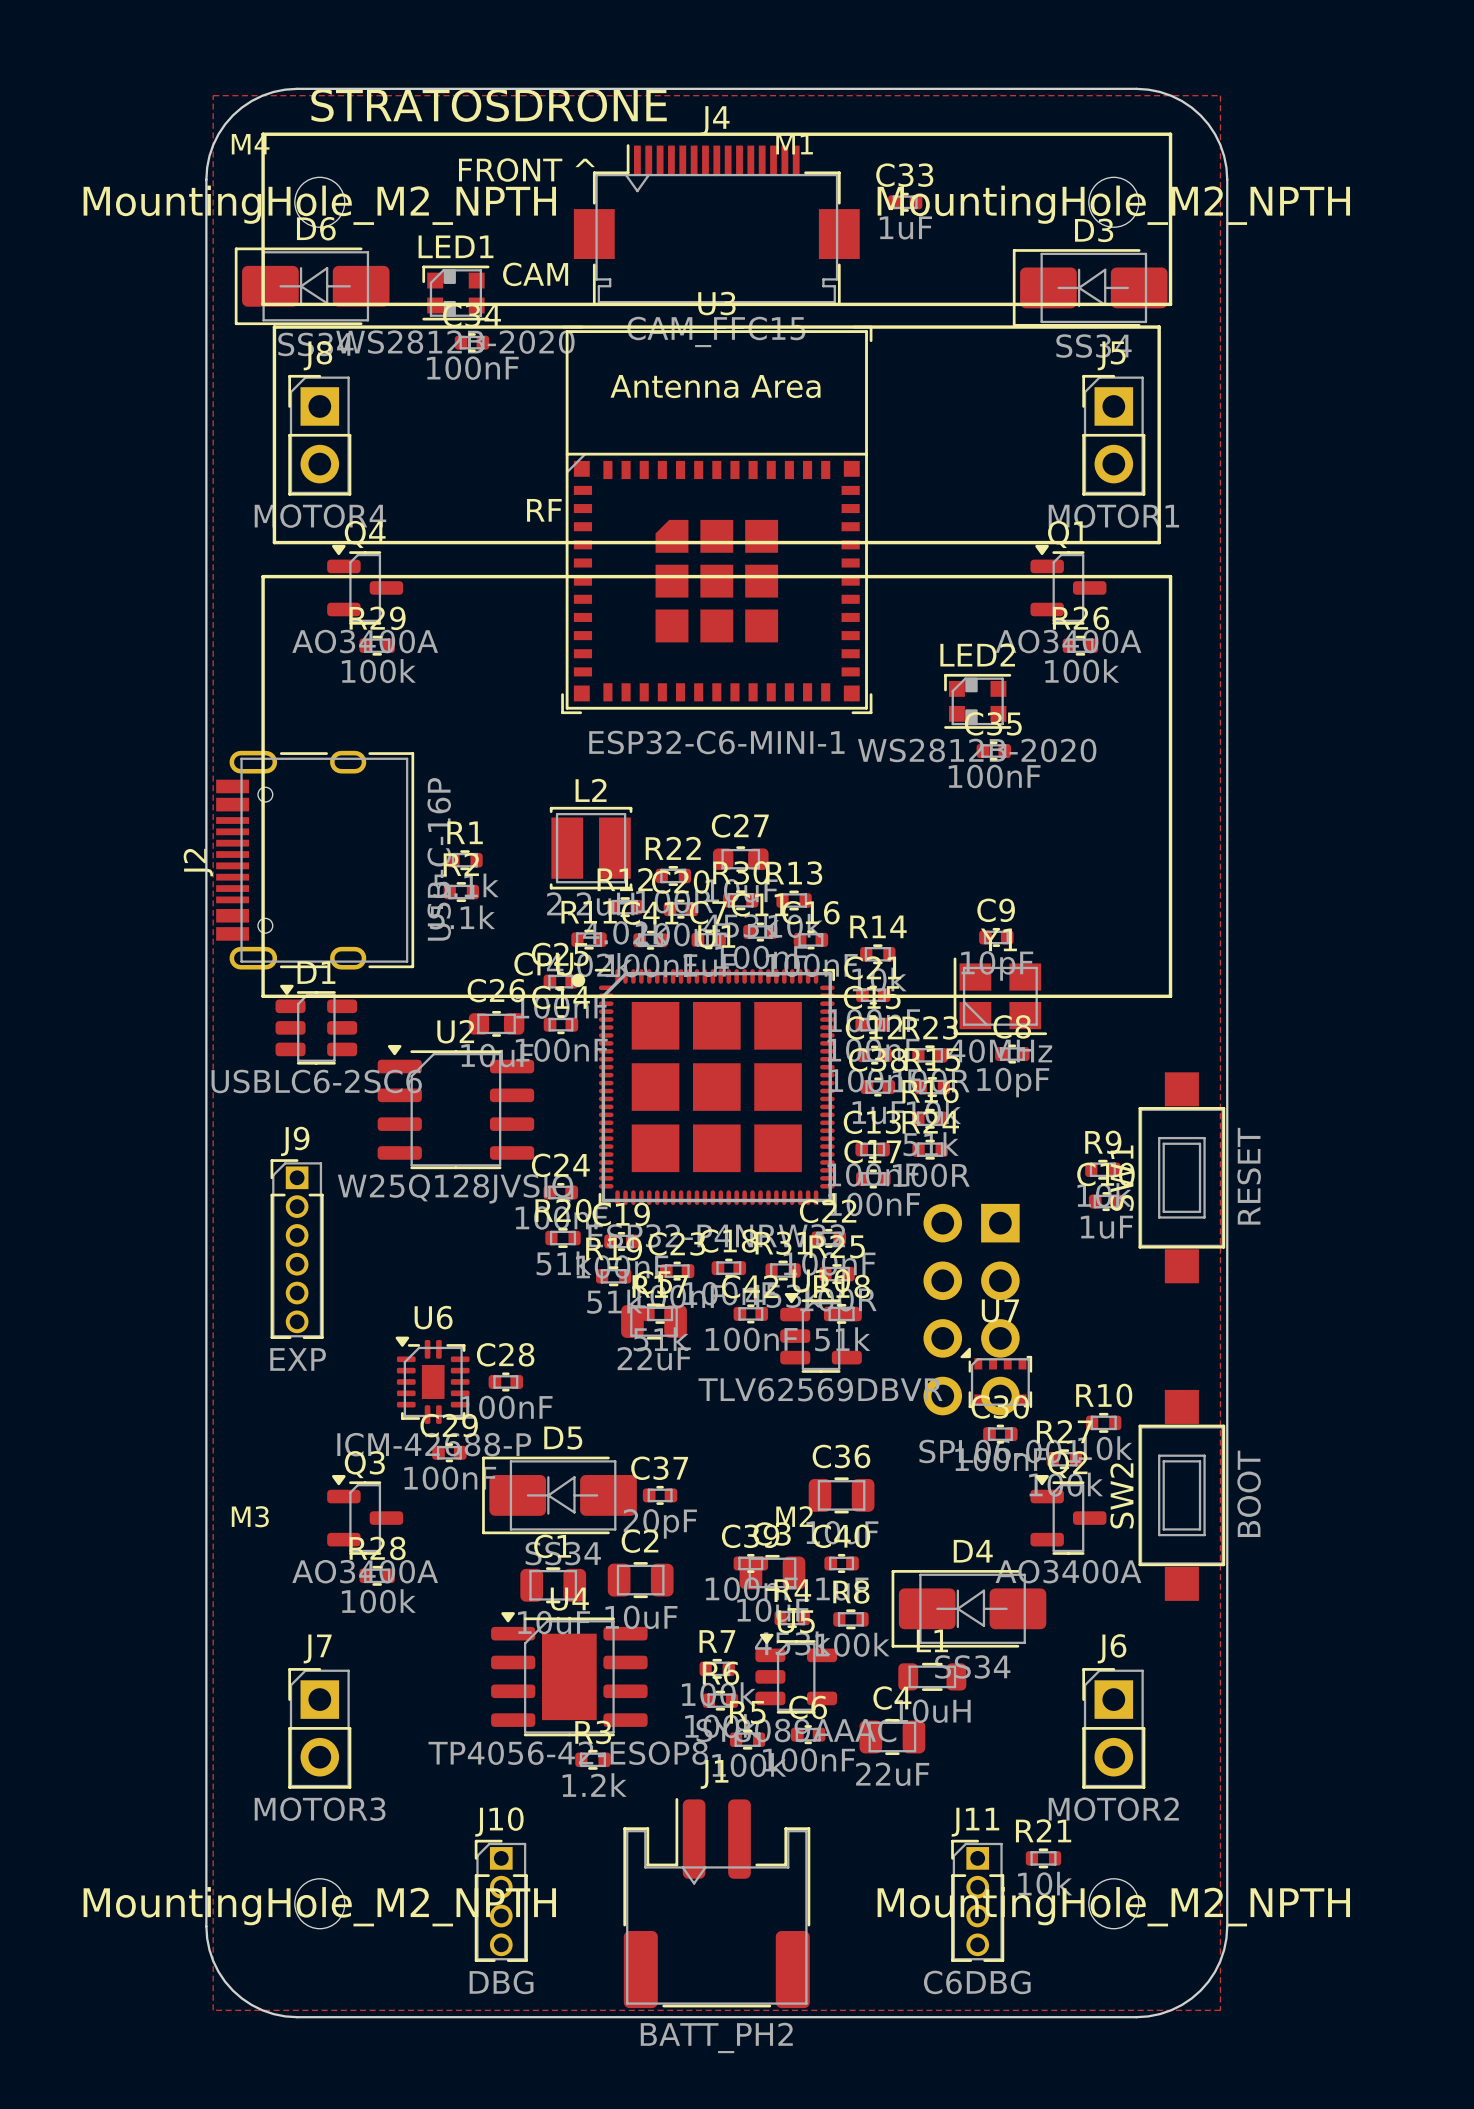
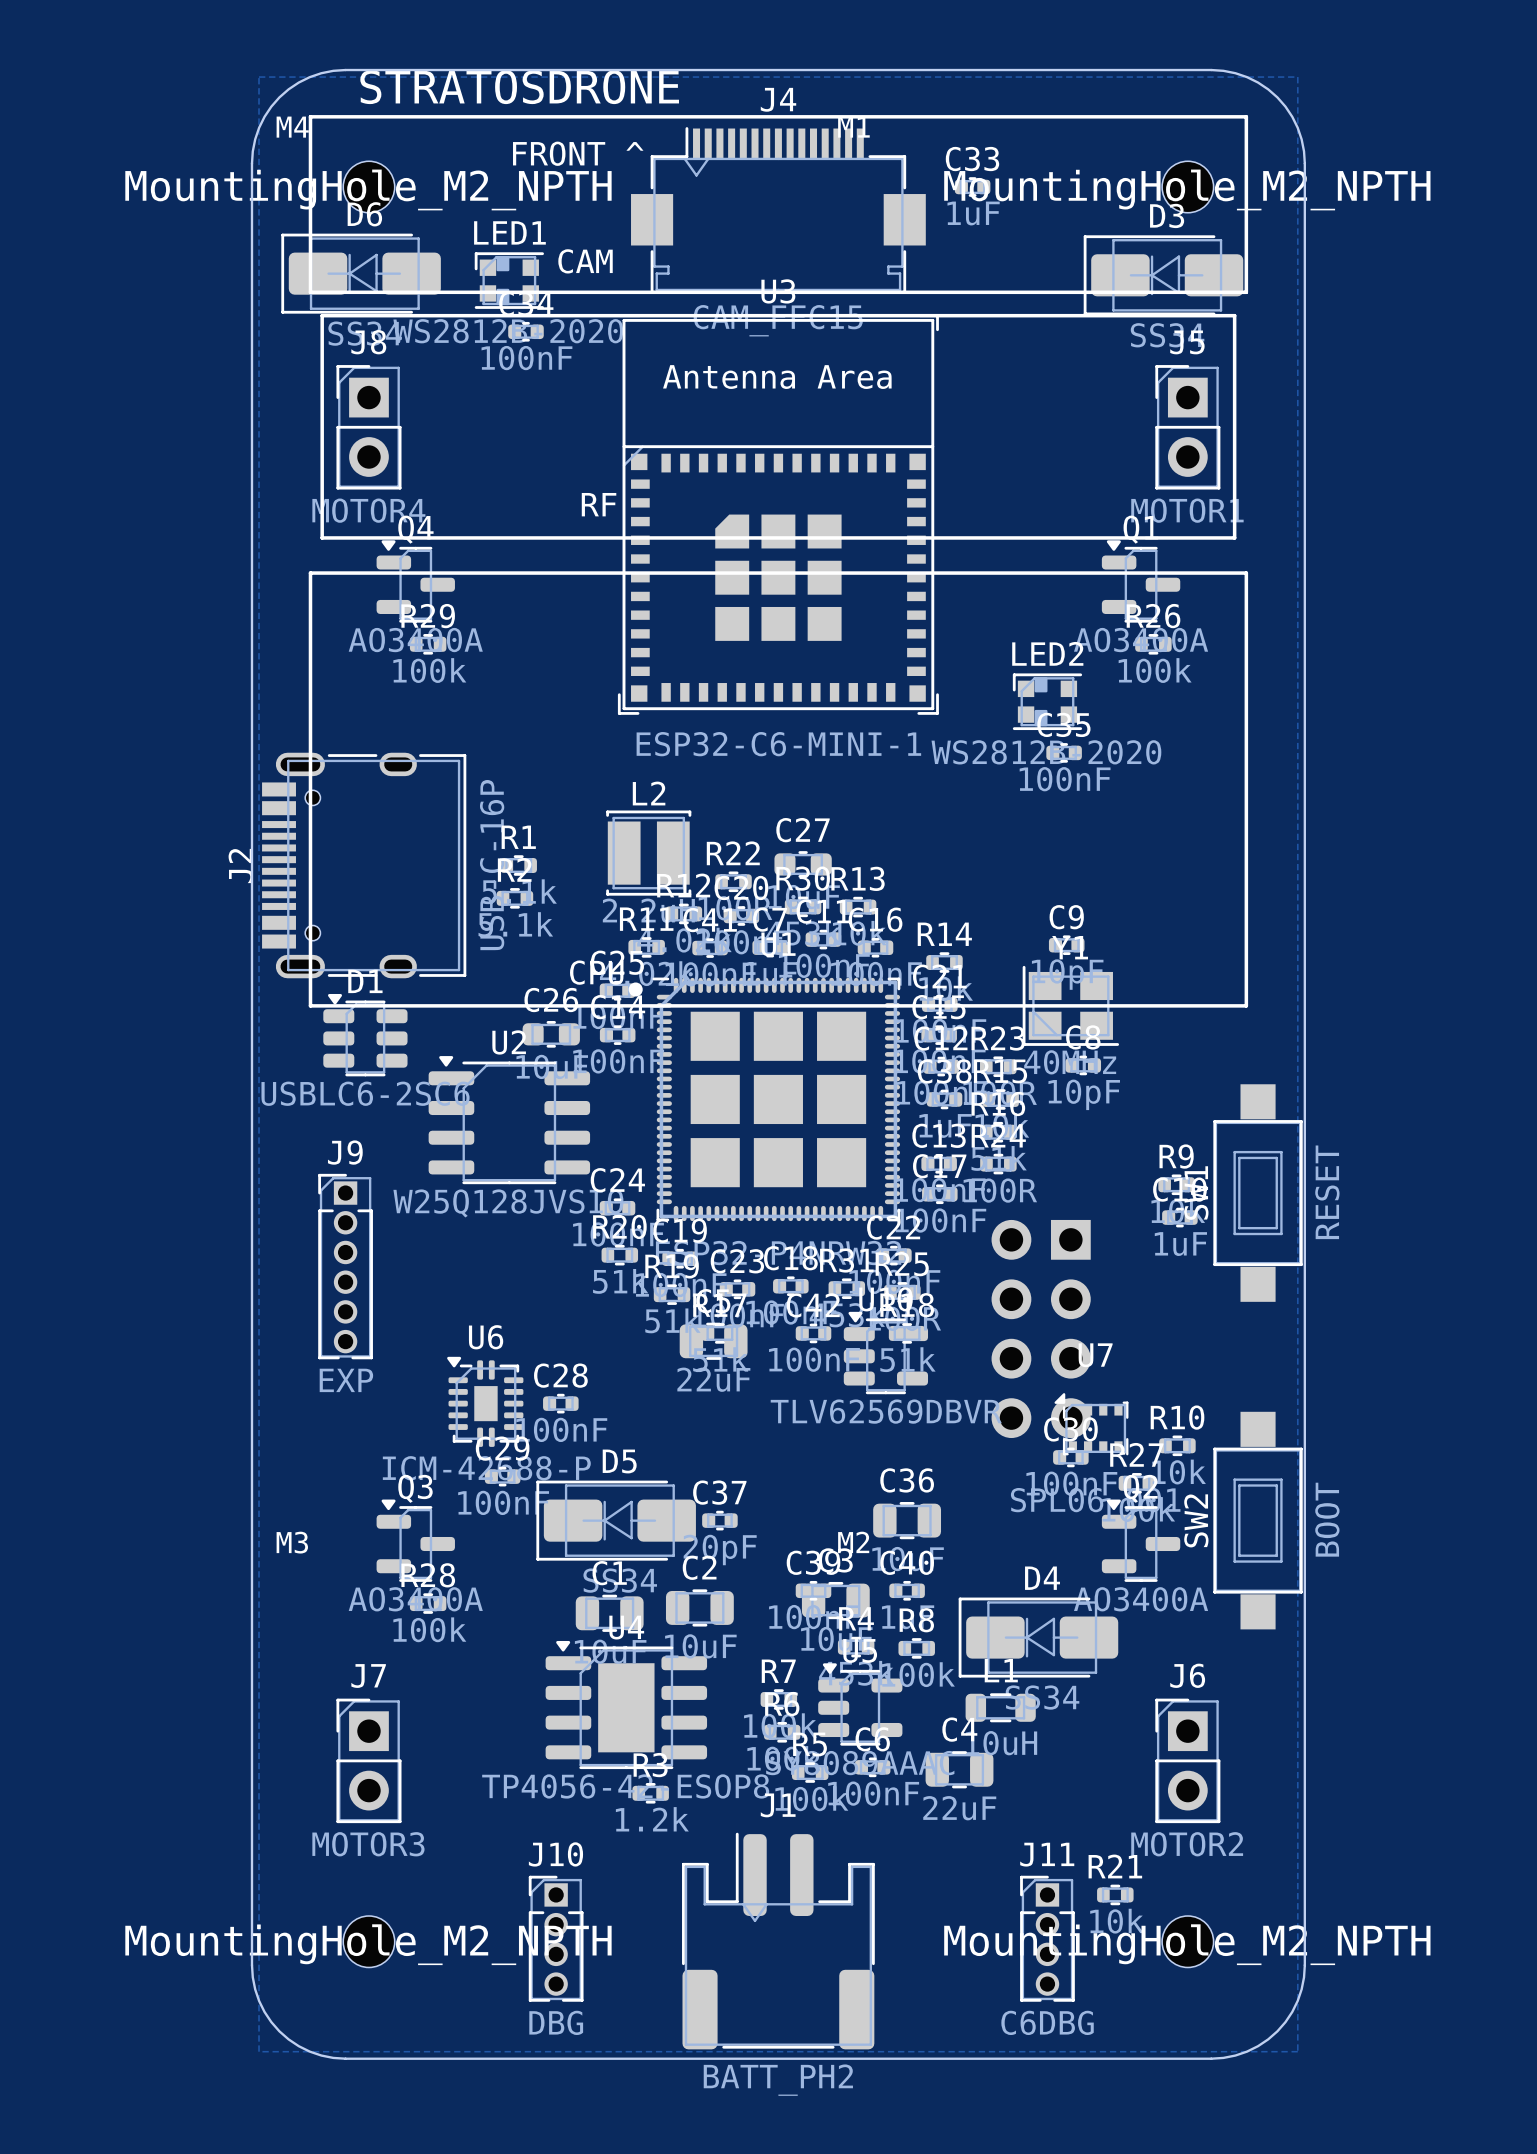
U7 position: (996, 1377) -> (1091, 1424)

